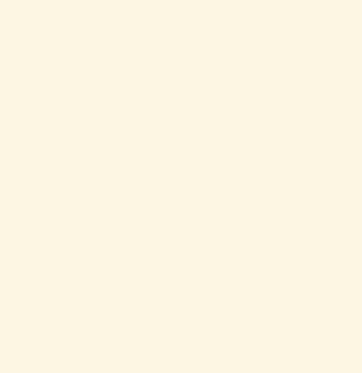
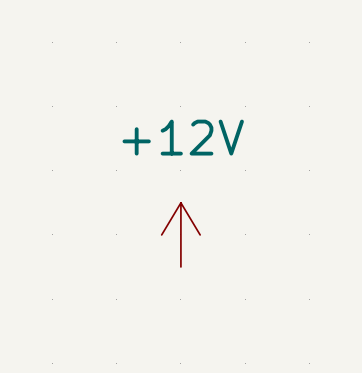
power symbol: none -> +12V (180, 234)

